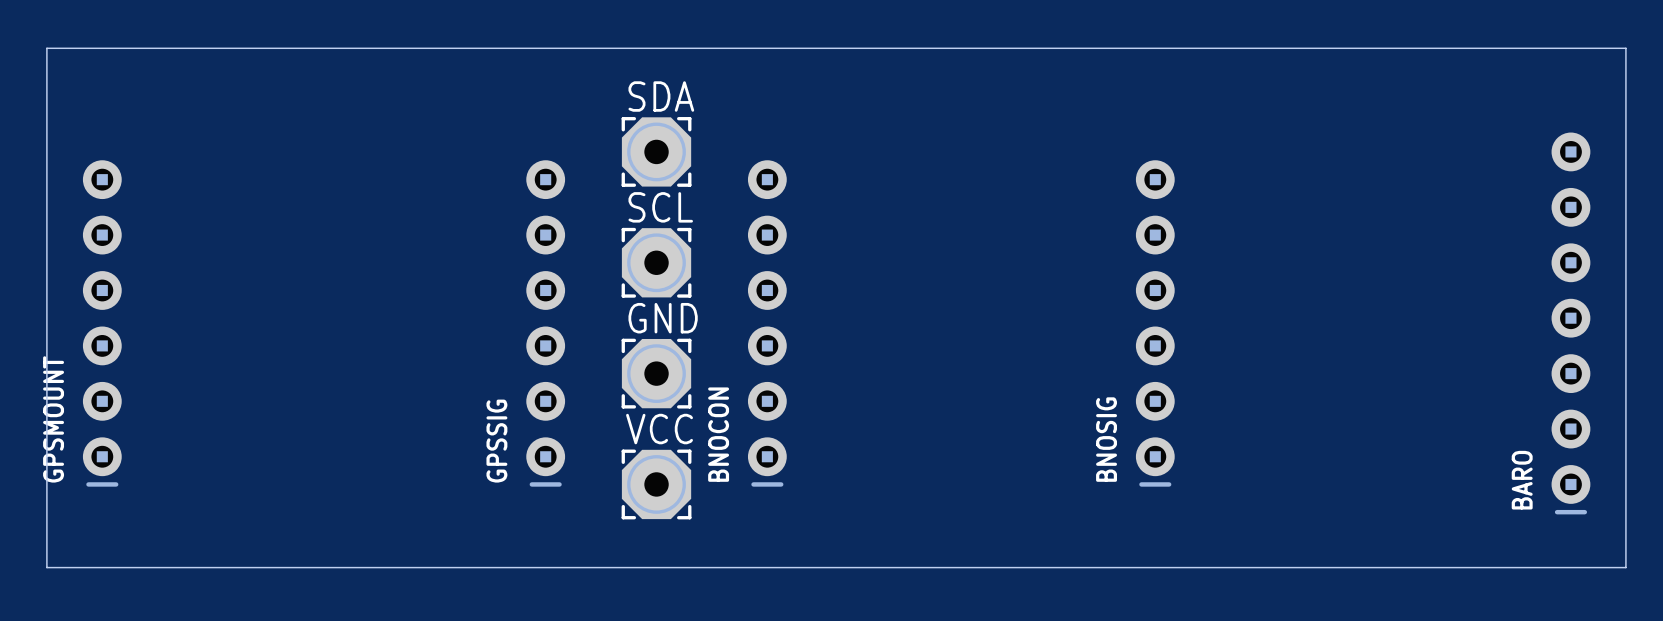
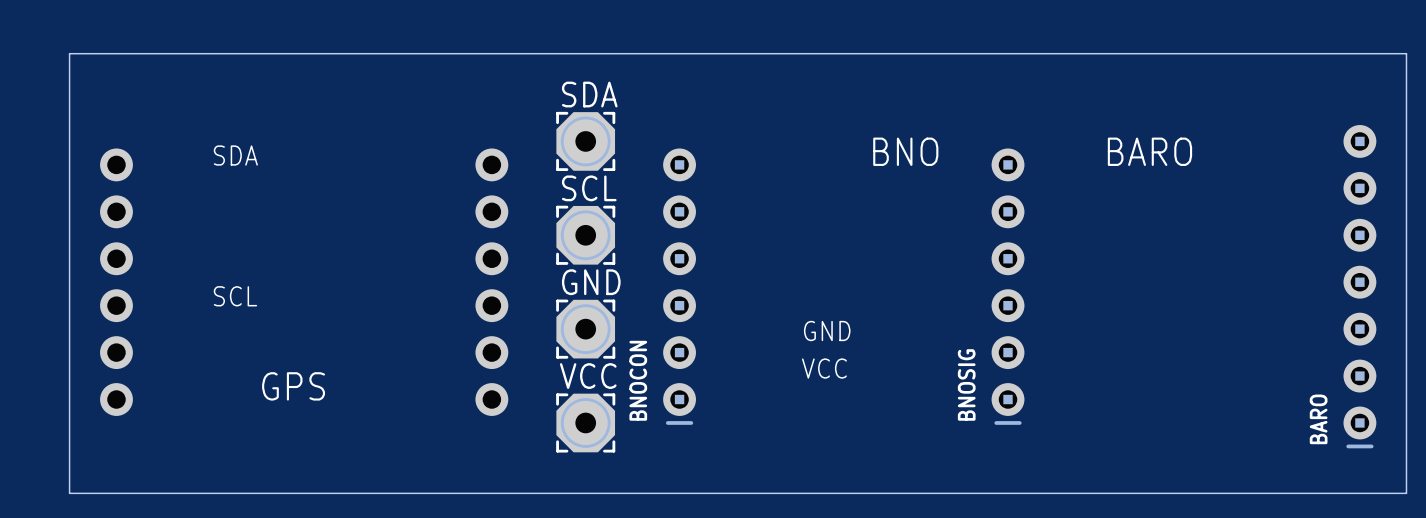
text: none -> BNO (905, 151)
text: none -> BARO (1149, 151)
text: none -> SDA (235, 155)
GPSMOUNT side: top (102, 323) -> bottom (491, 282)
GPSSIG side: top (545, 323) -> bottom (116, 282)
text: none -> SCL (235, 296)
text: none -> GND (827, 331)
text: none -> VCC (824, 368)
text: none -> GPS (293, 386)

